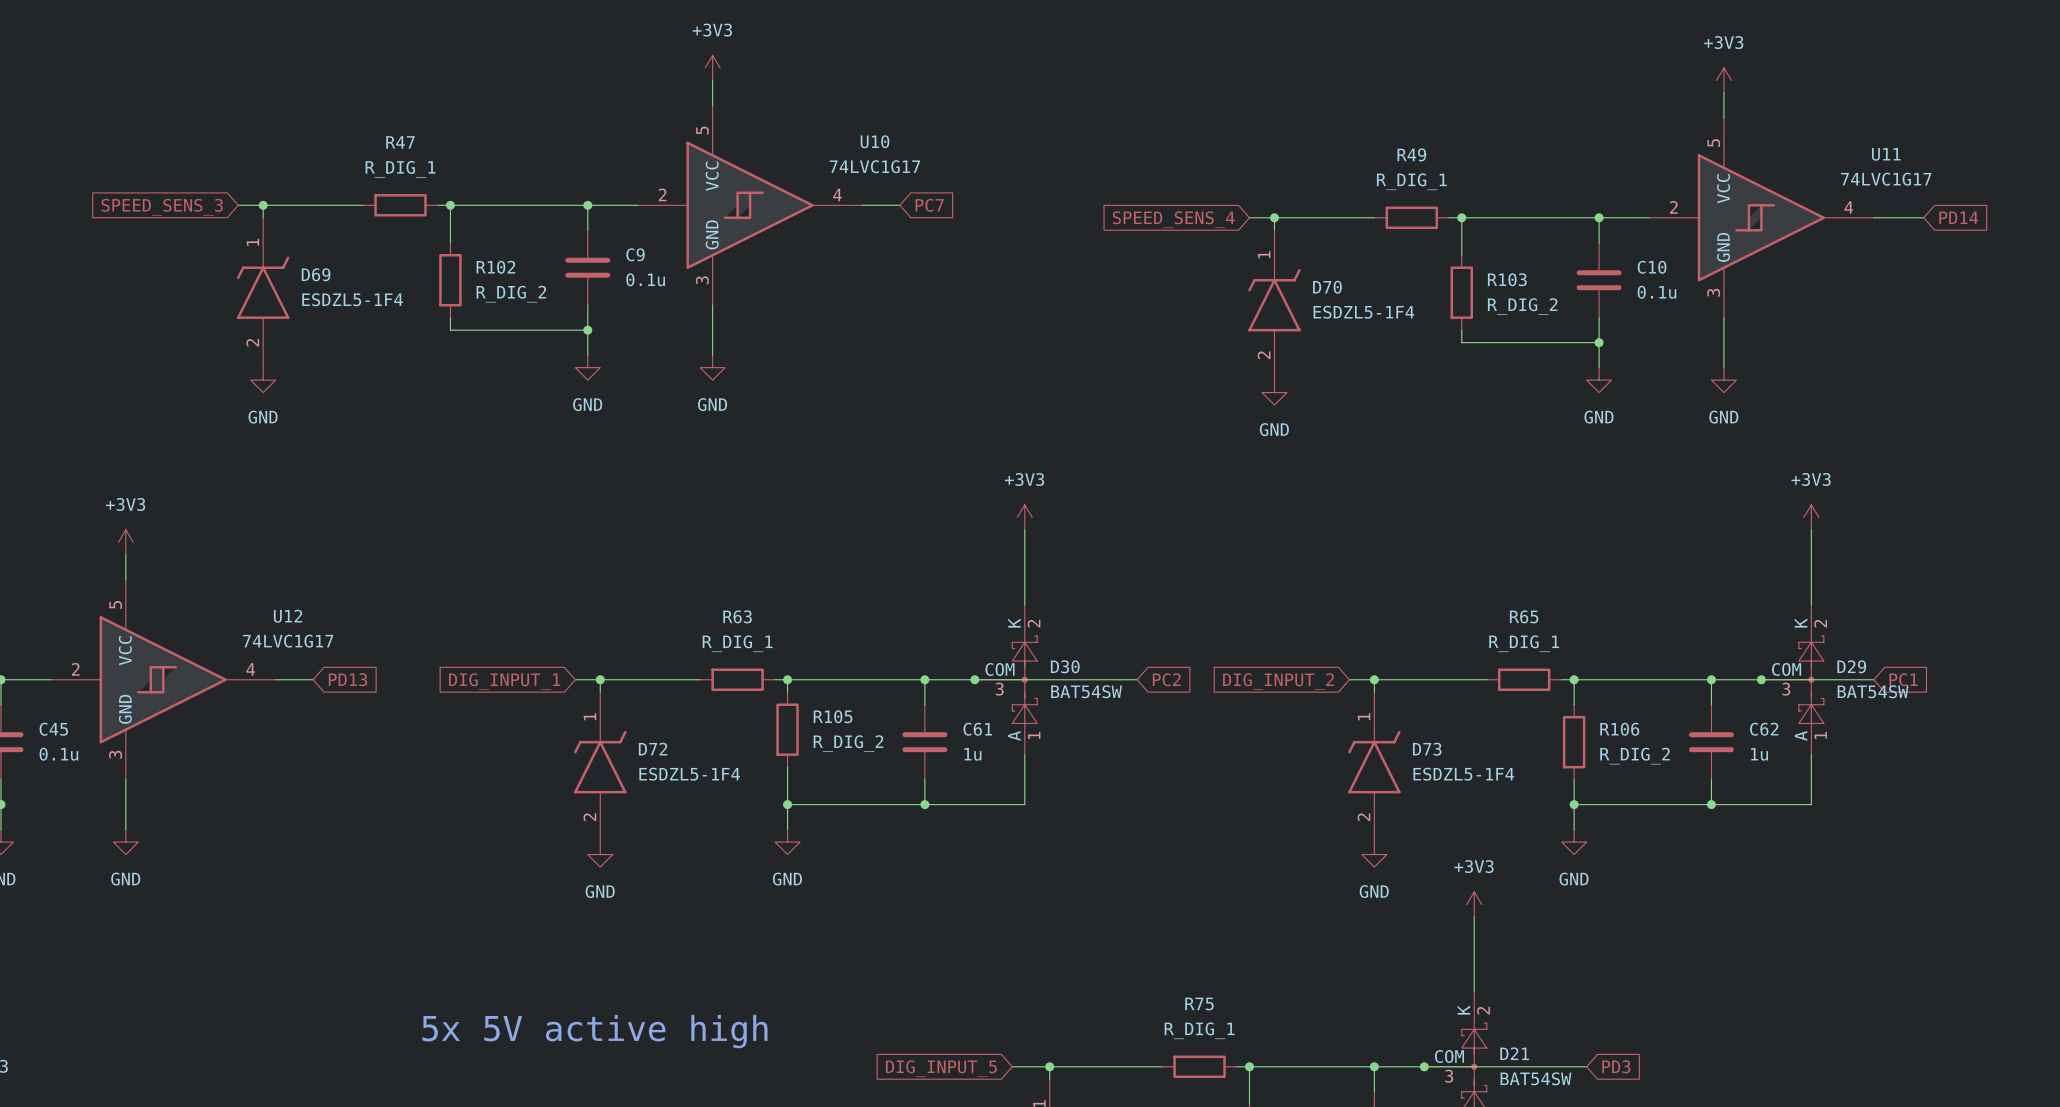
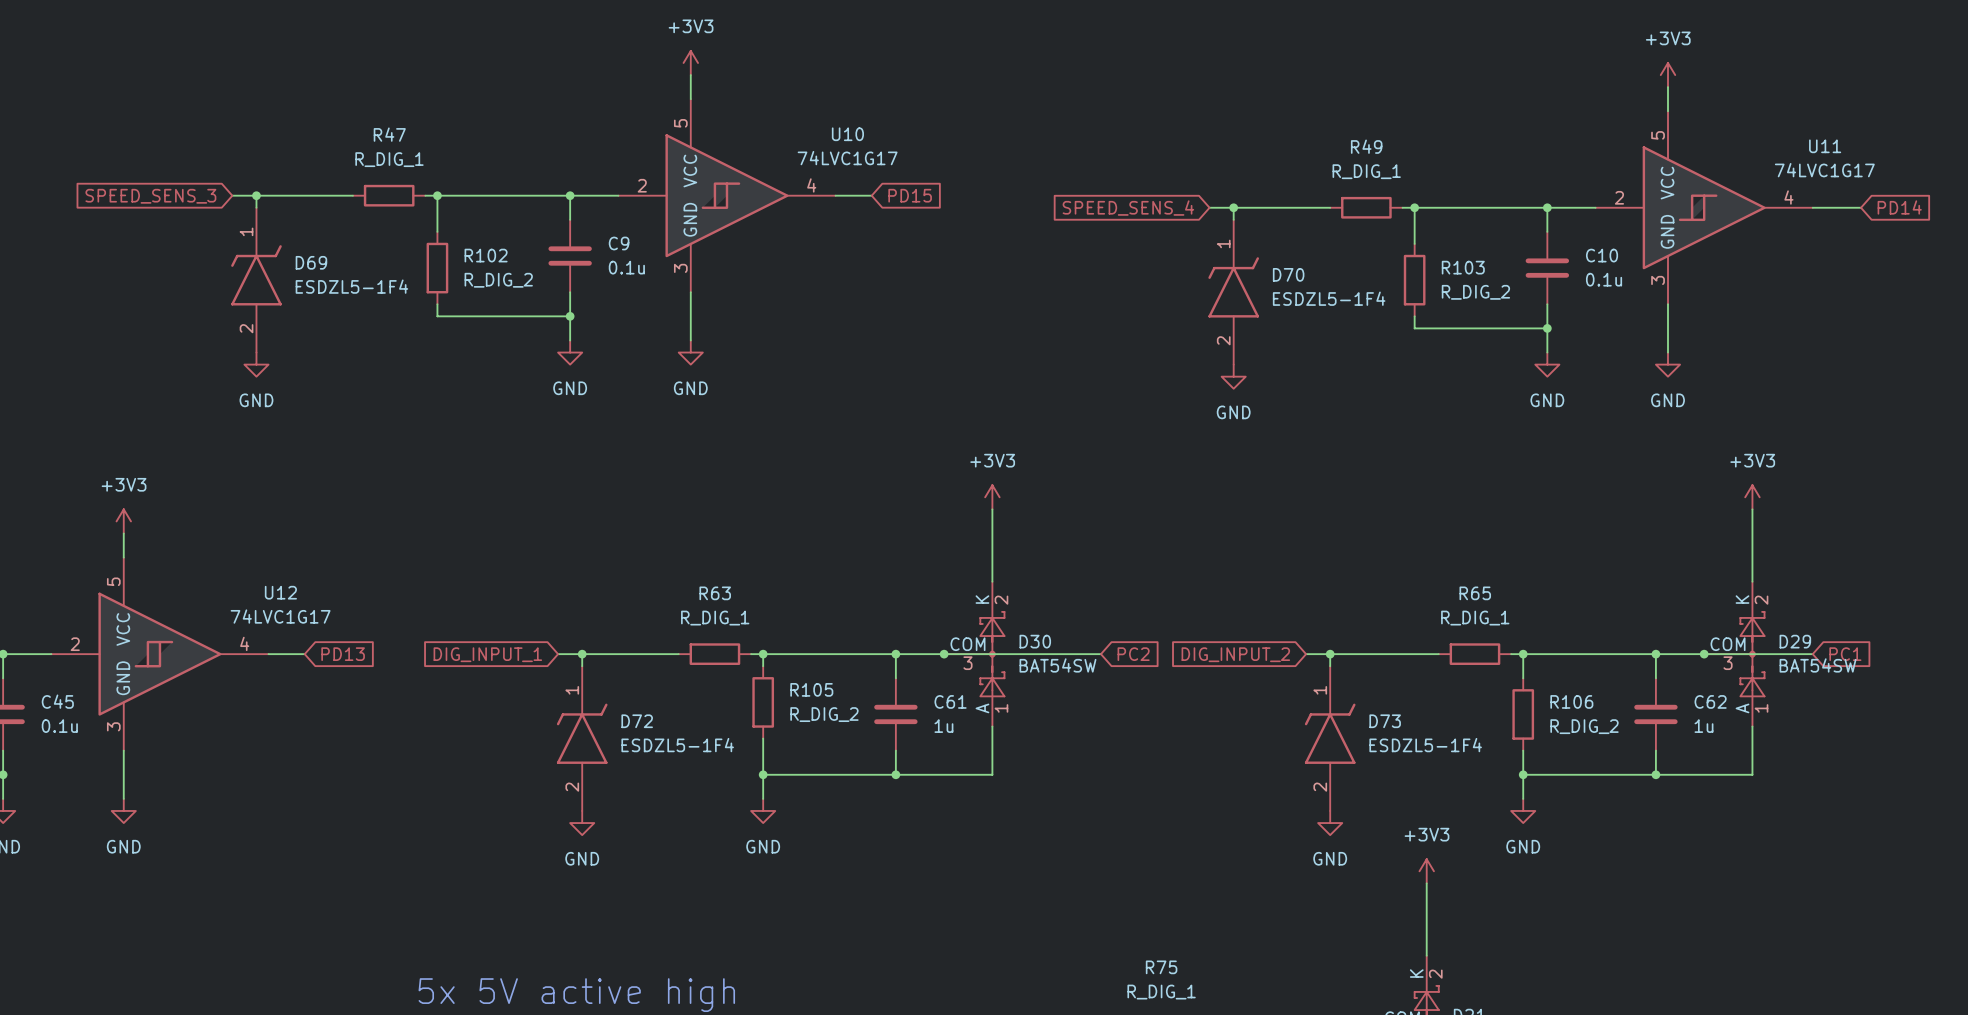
global label: PC7 (929, 205) -> PD15 (910, 195)

